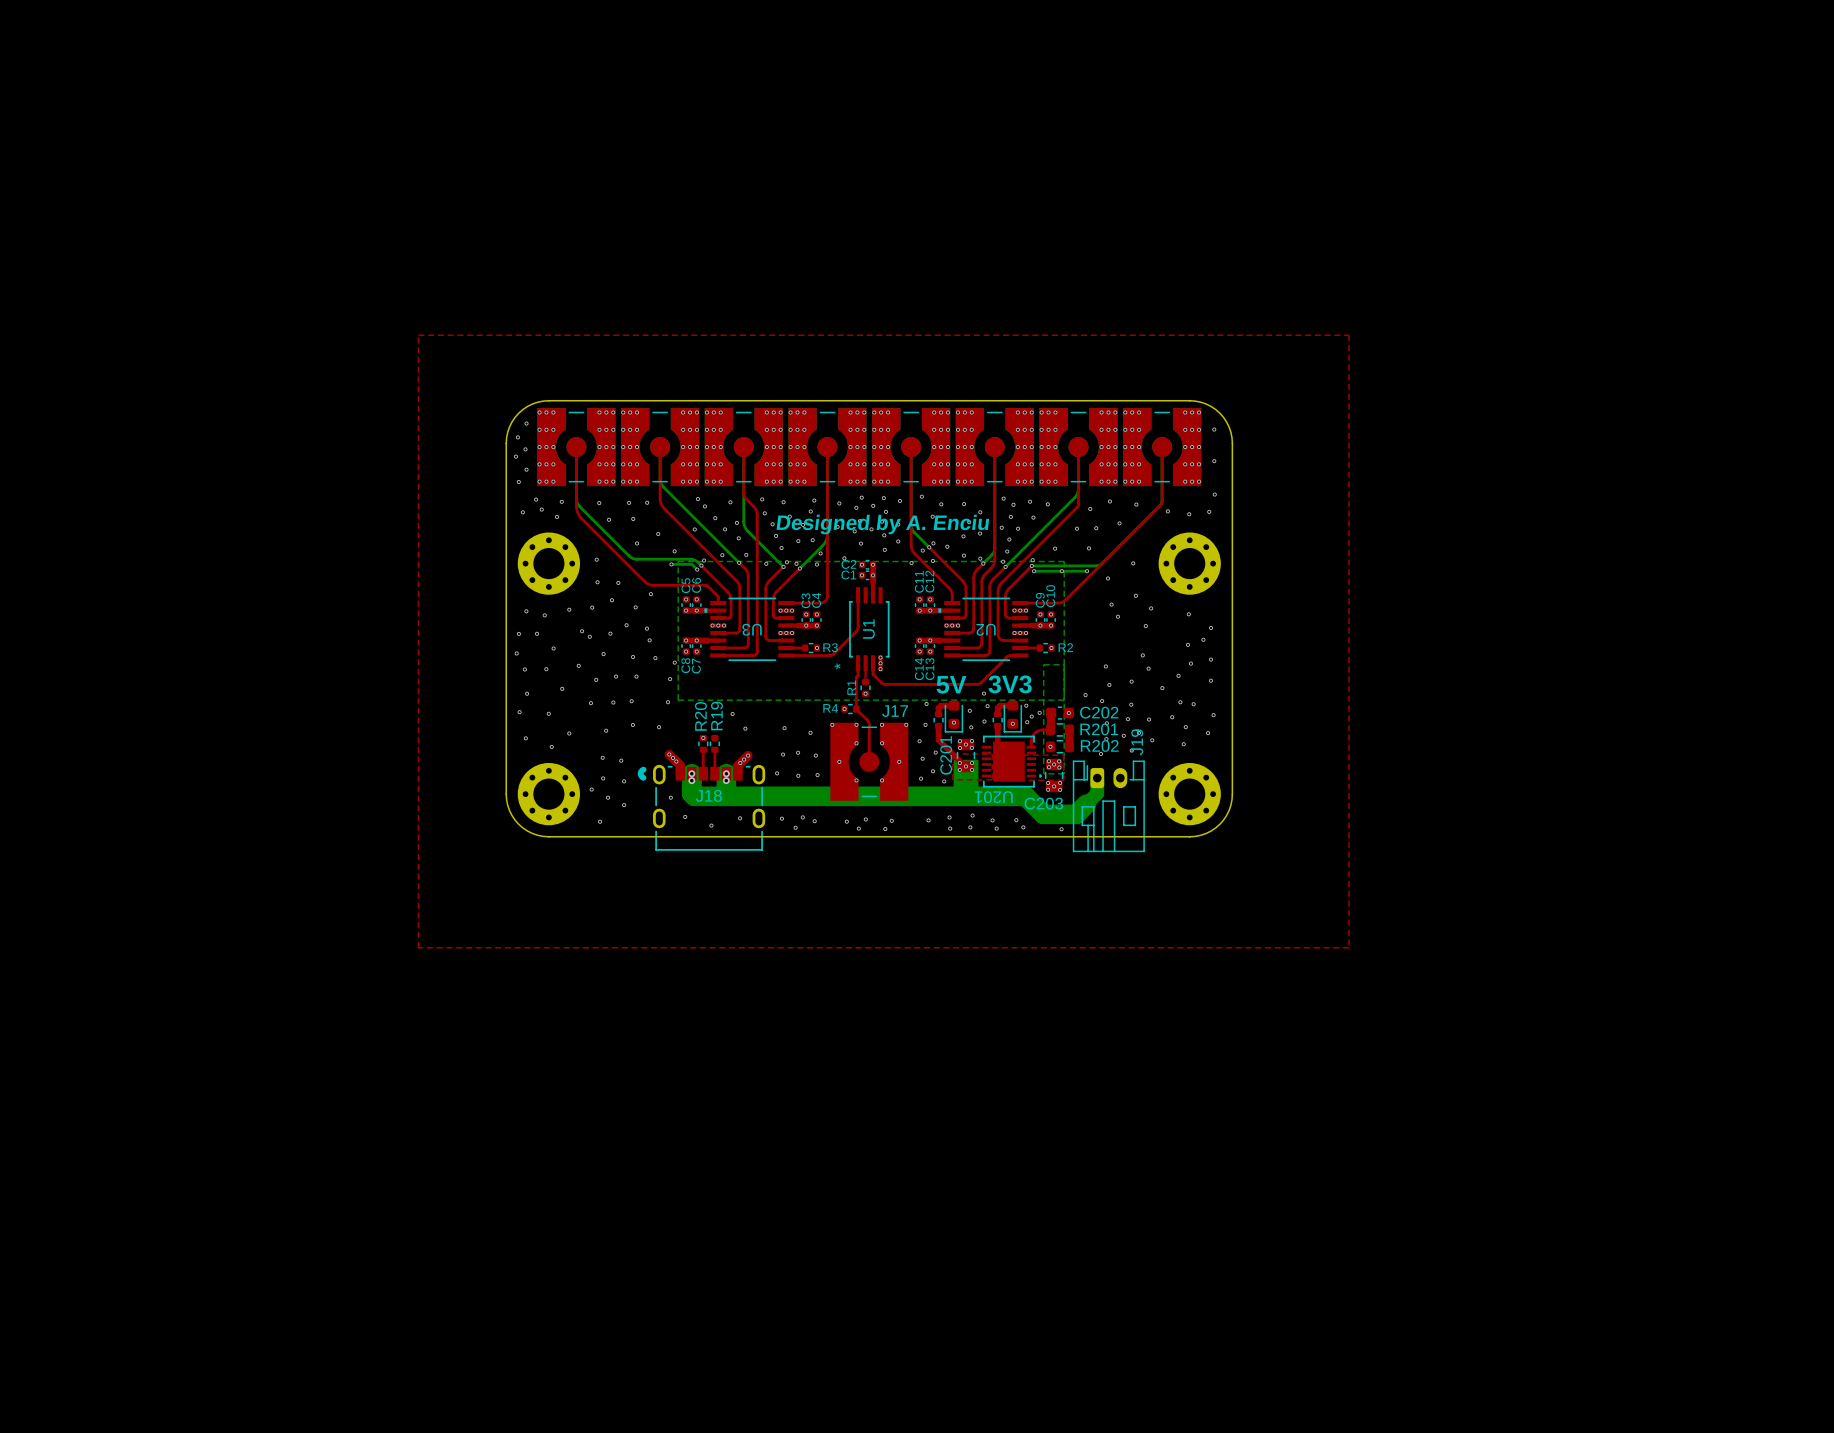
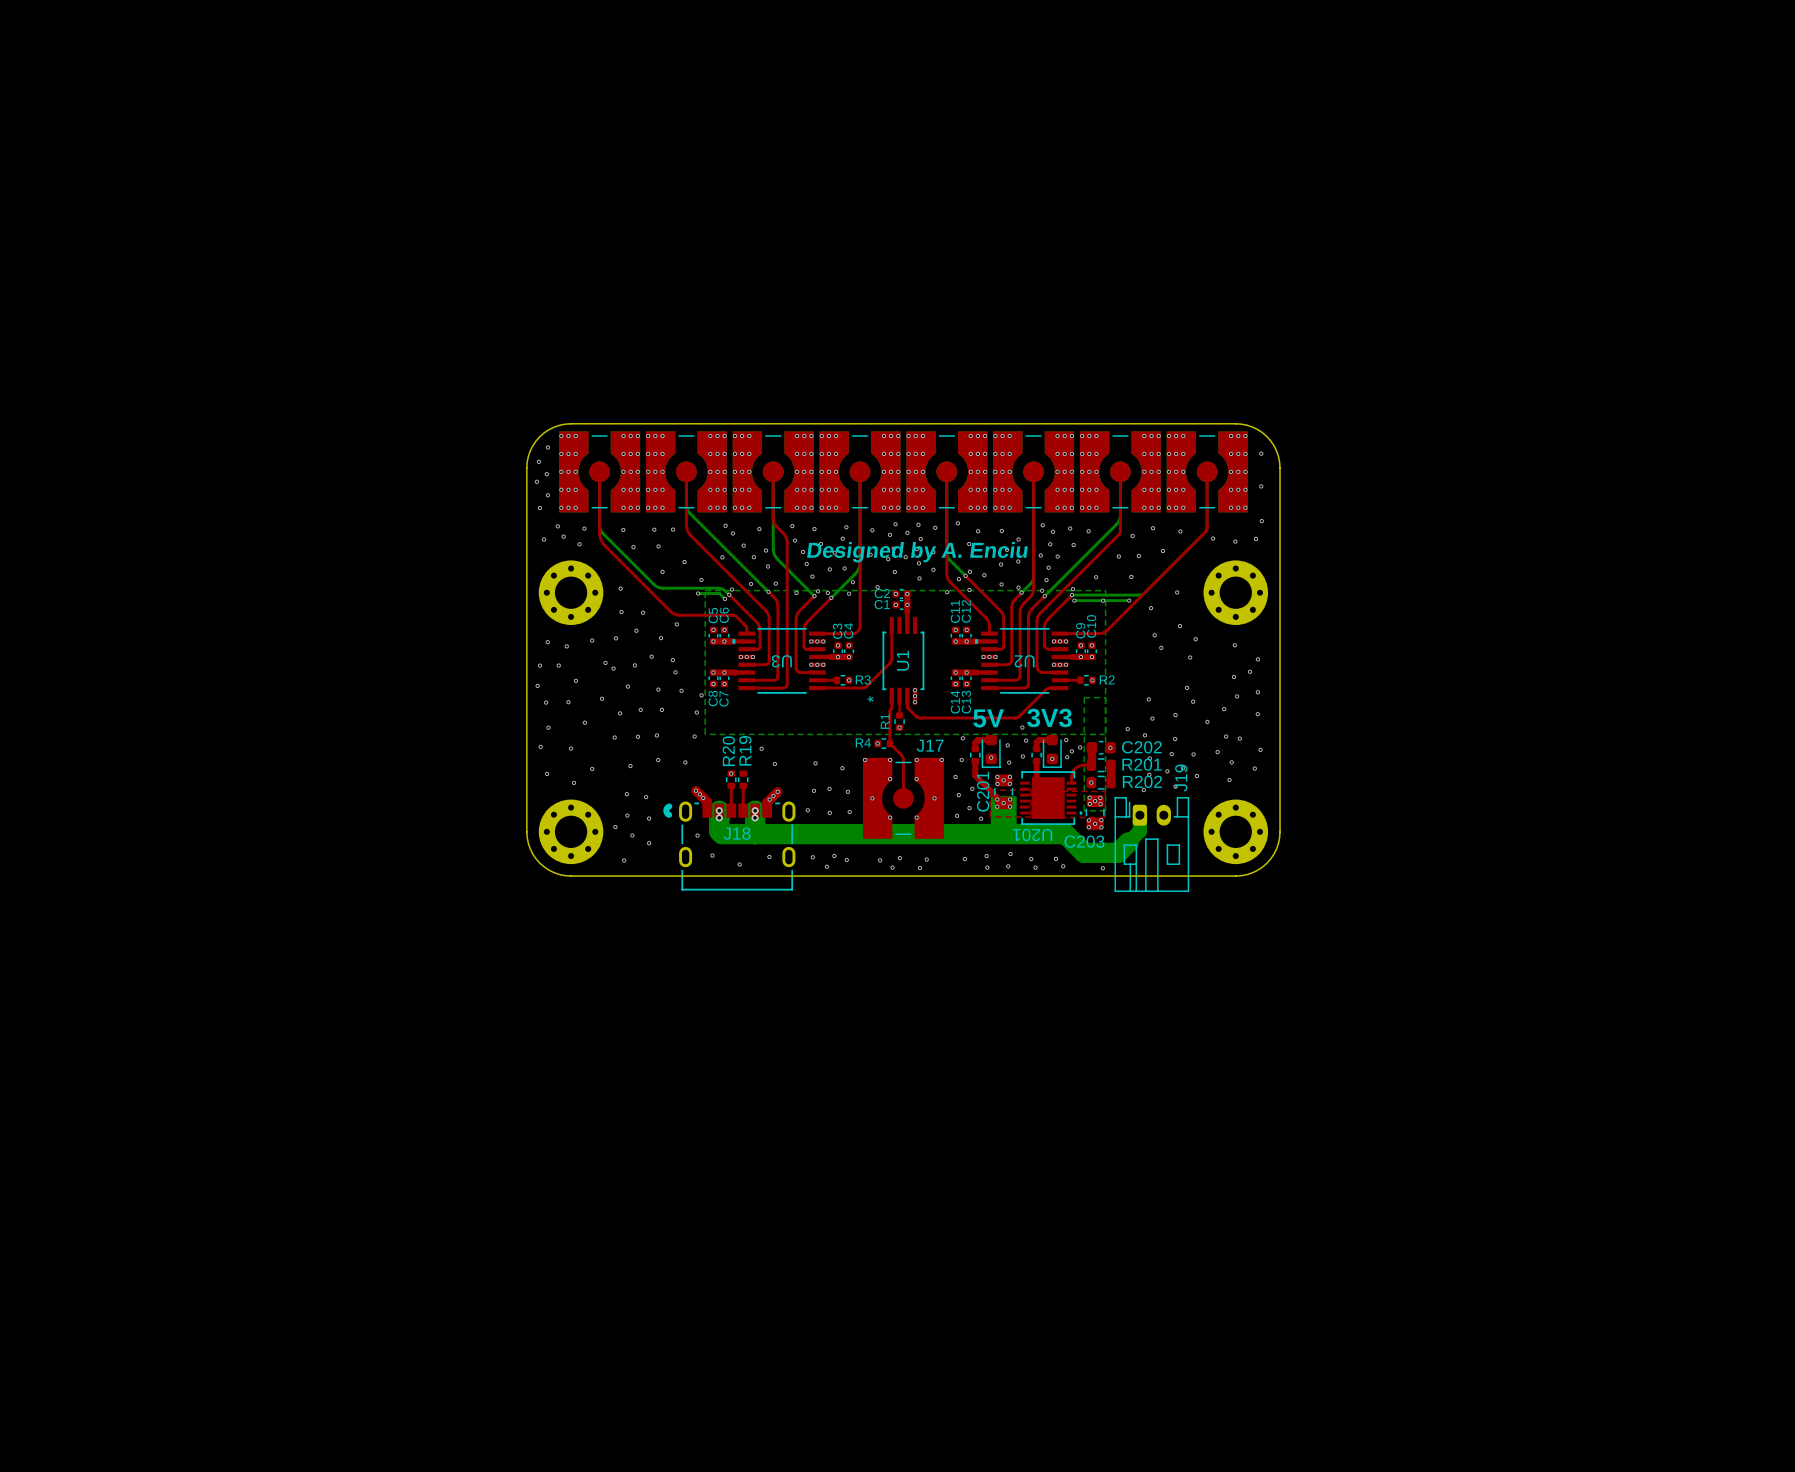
top zone outline: (418, 335) (1349, 335) (1349, 947) (418, 947) (418, 335) -> none

